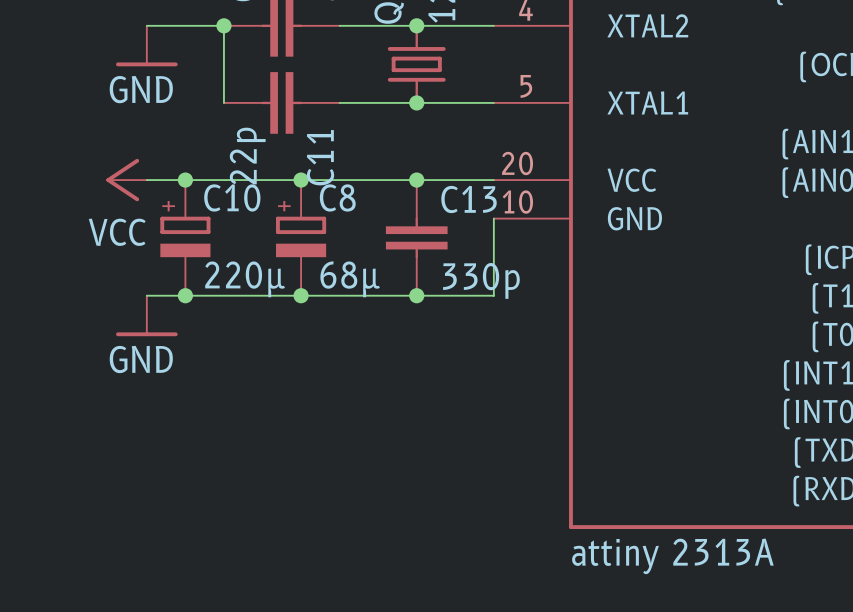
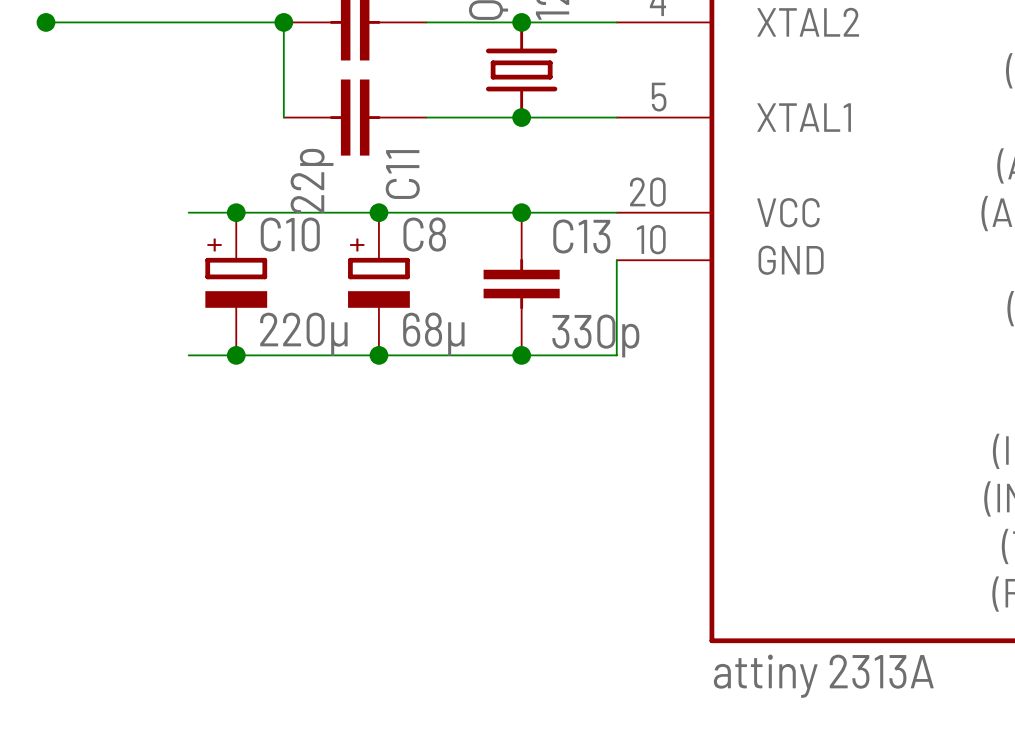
wire: none -> (46, 22) (188, 22)
junction: none -> (46, 22)
power symbol: GND (146, 46) -> none
power symbol: VCC (126, 180) -> none
power symbol: GND (146, 315) -> none

